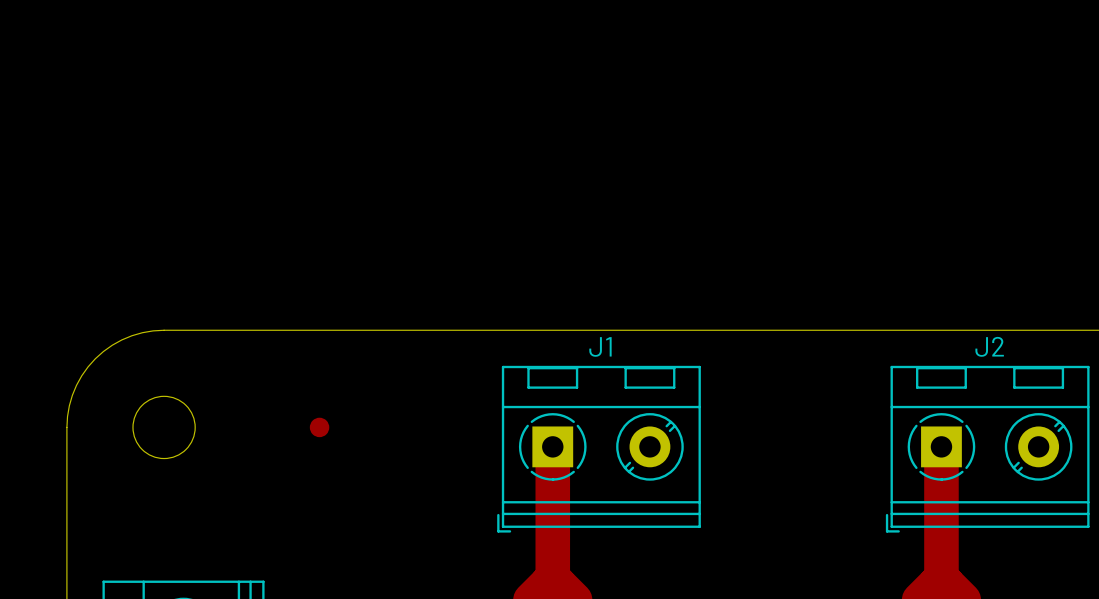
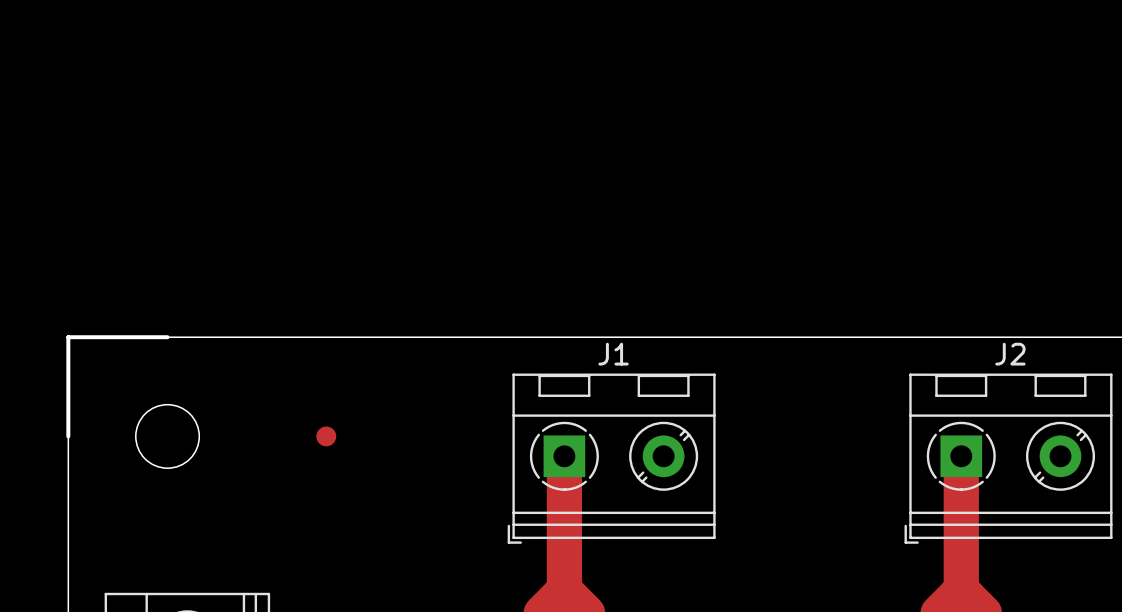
board edge: (164, 330) (142, 332) (121, 339) (95, 358) (81, 375) (72, 395) (66, 427) -> (167, 337) (68, 337) (68, 436)

